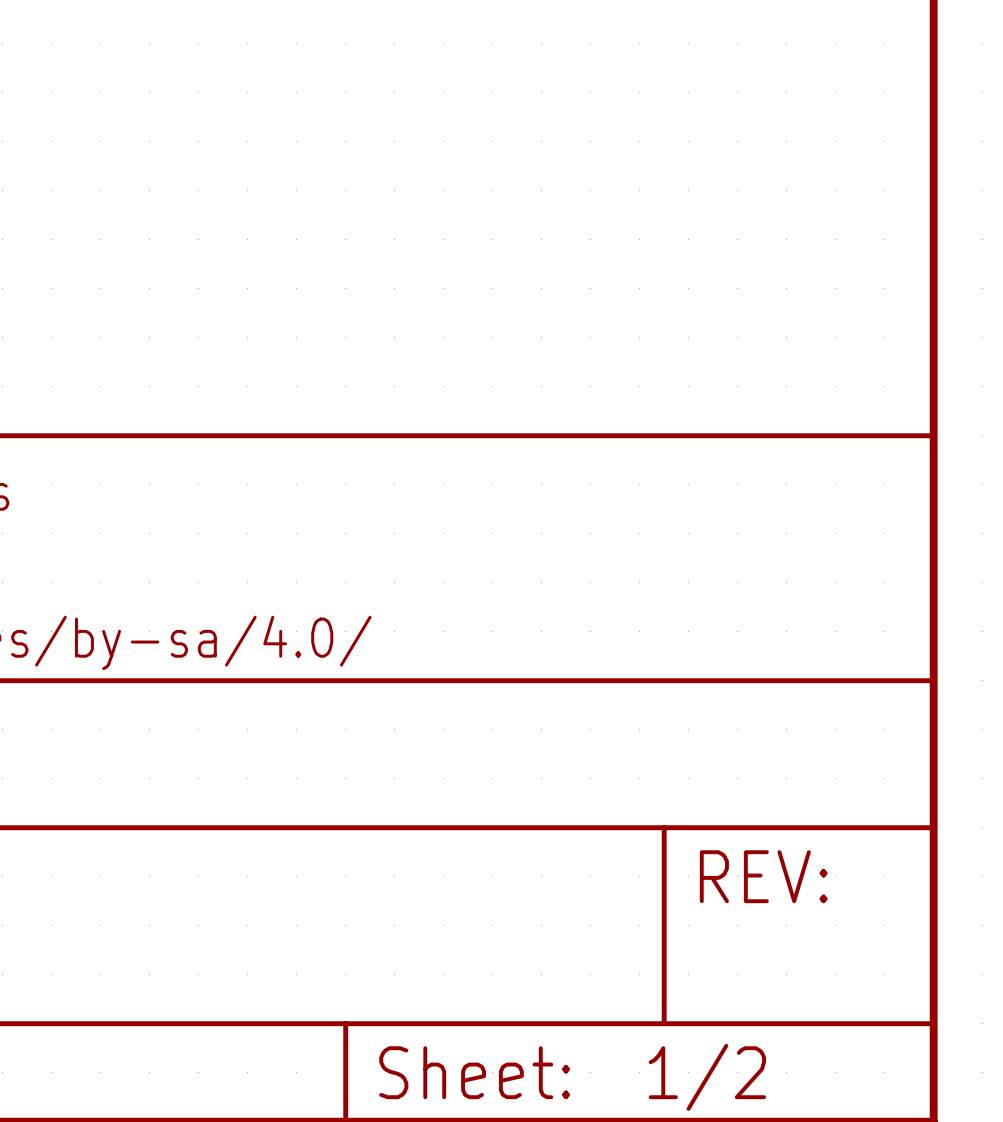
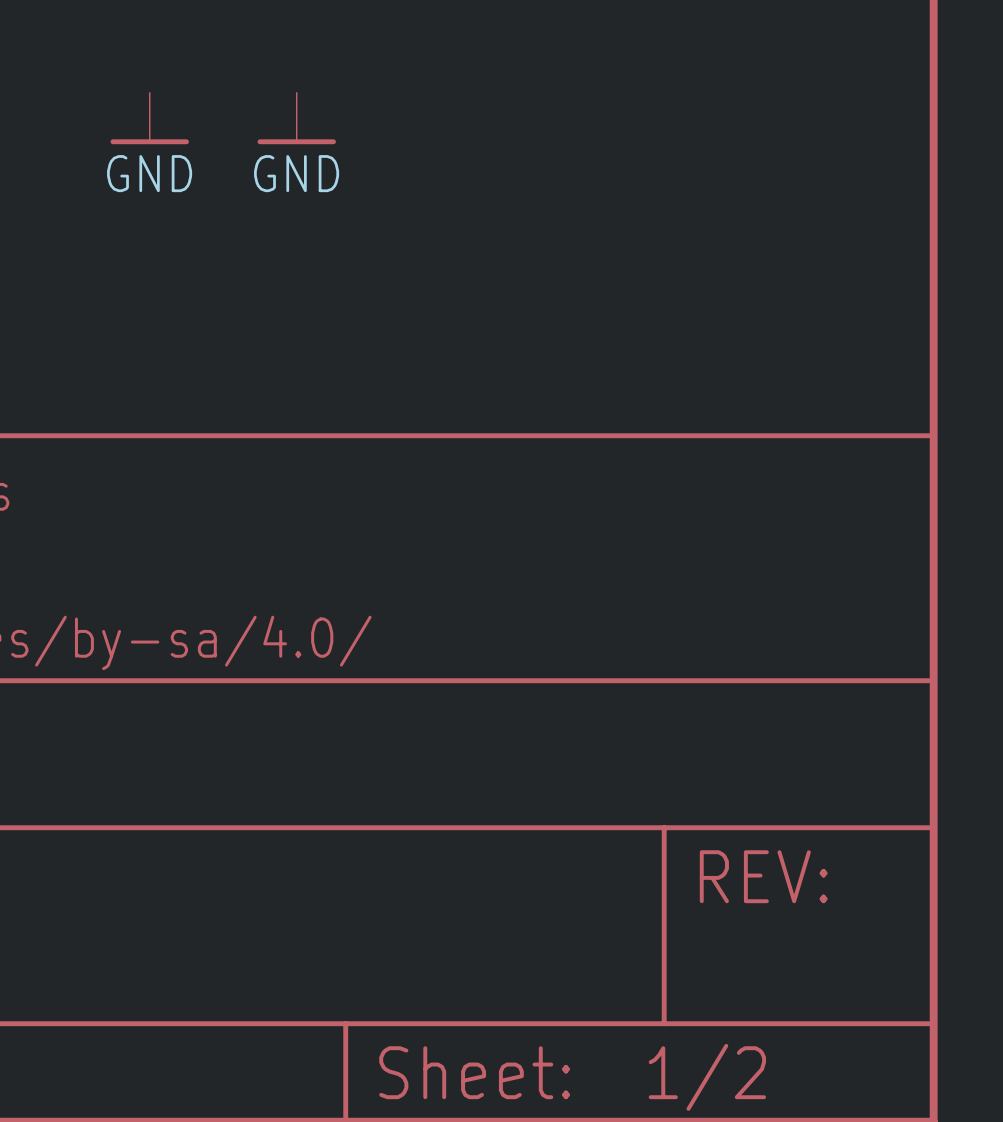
power symbol: none -> GND (149, 118)
power symbol: none -> GND (296, 118)

